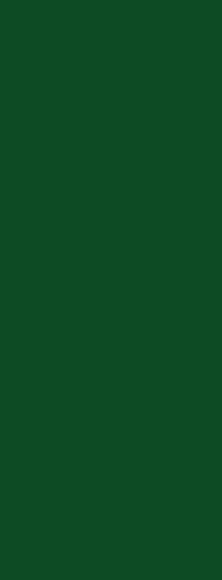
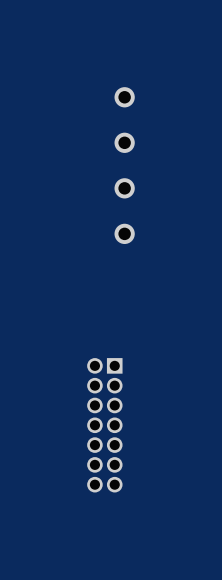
part: none -> (124, 97)
part: none -> (124, 142)
part: none -> (124, 188)
part: none -> (124, 233)
part: none -> (104, 425)

